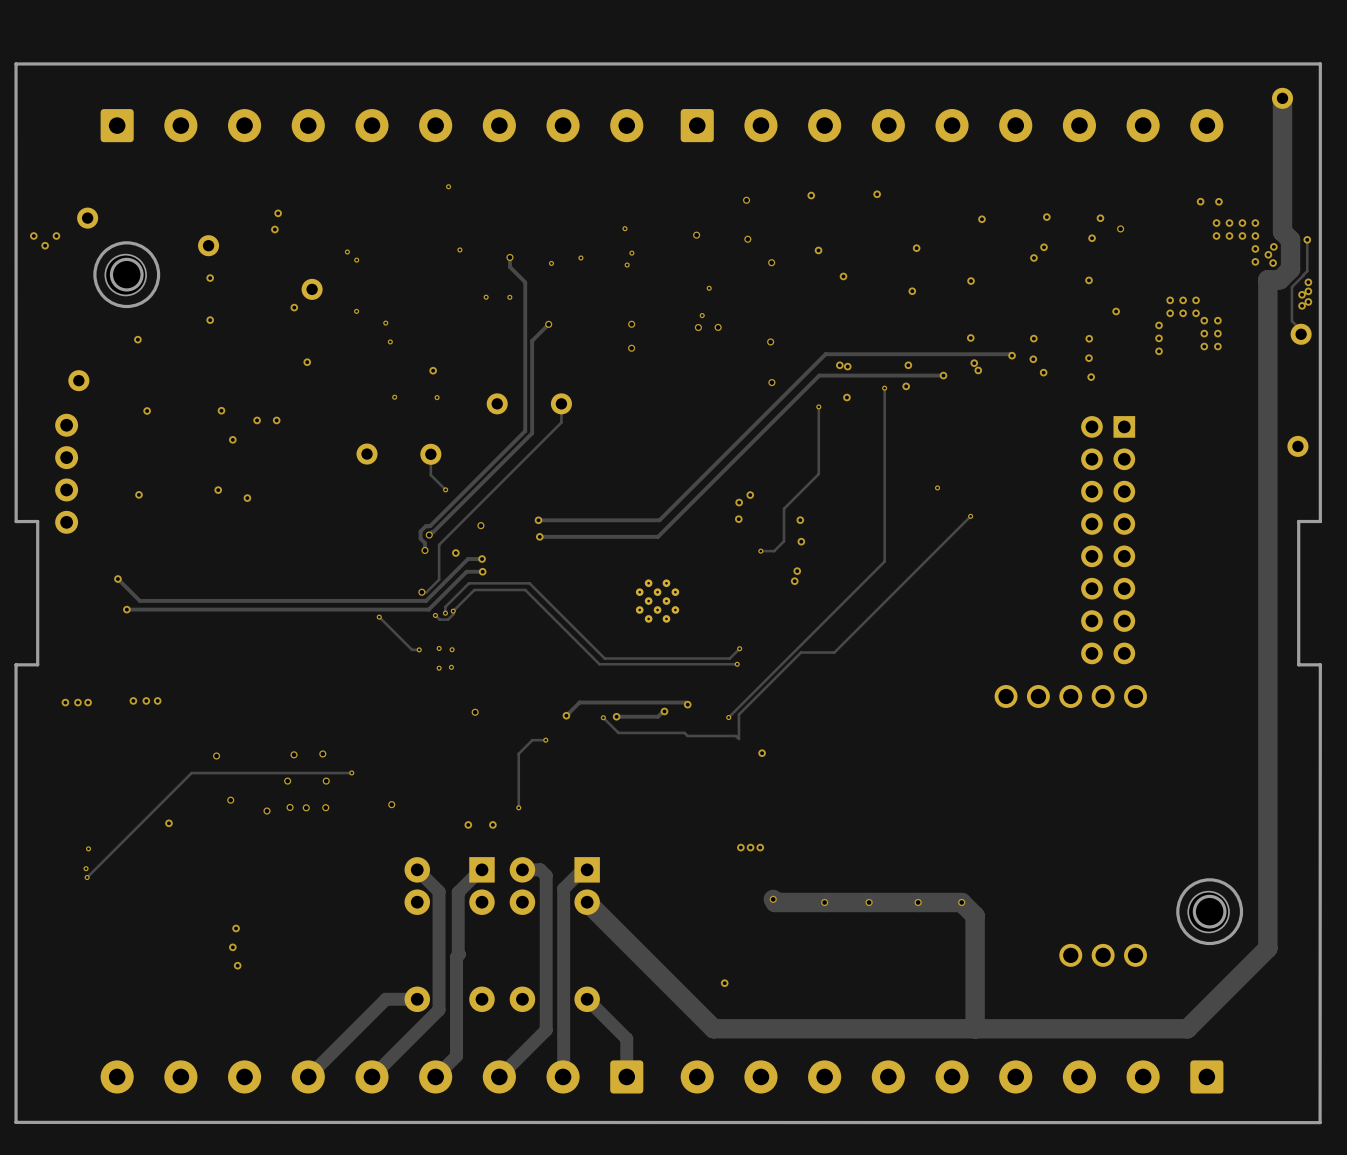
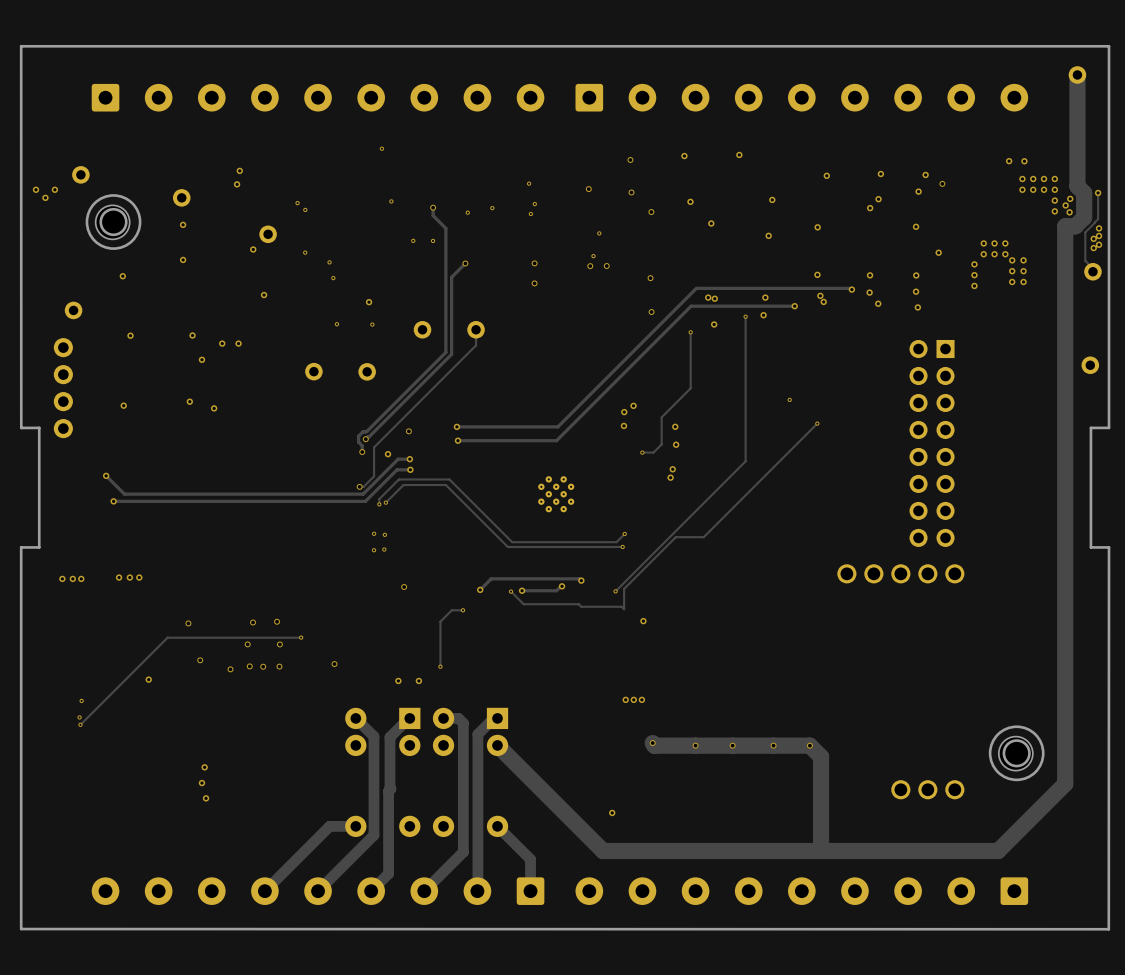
track: (430, 454) (430, 475) (445, 489) -> none
via: (445, 489) -> none
track: (453, 611) (453, 614) (448, 619) (439, 619) (435, 615) -> none
via: (435, 615) -> none
track: (379, 617) (411, 649) (419, 649) -> none
via: (379, 617) -> none
via: (419, 649) -> none

